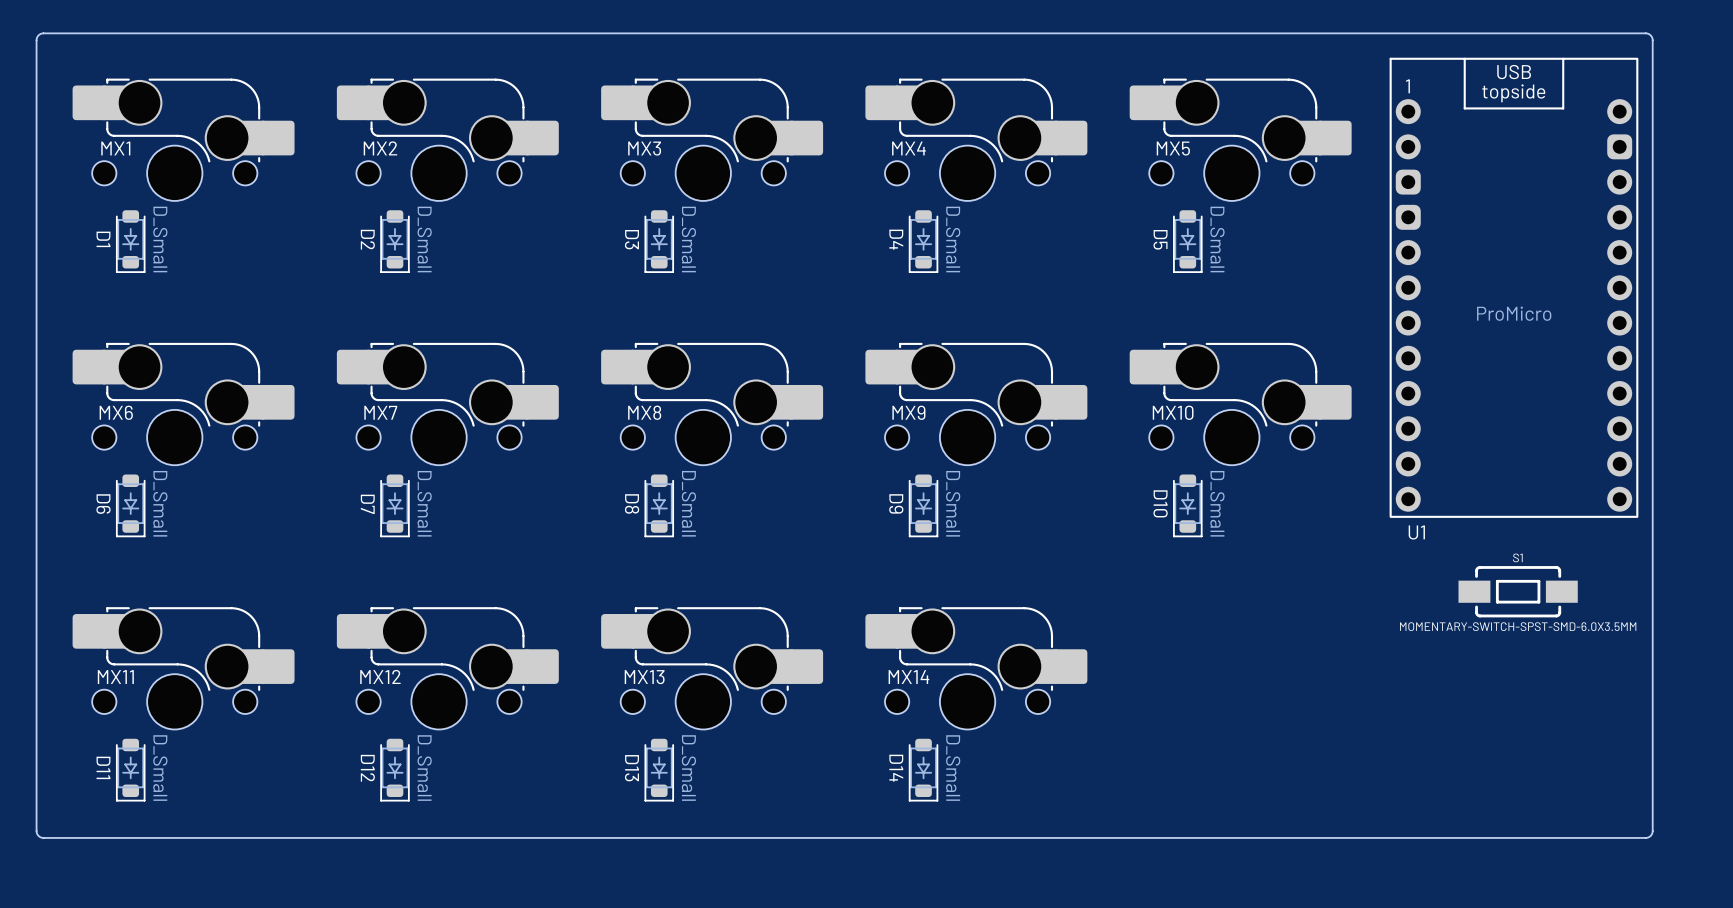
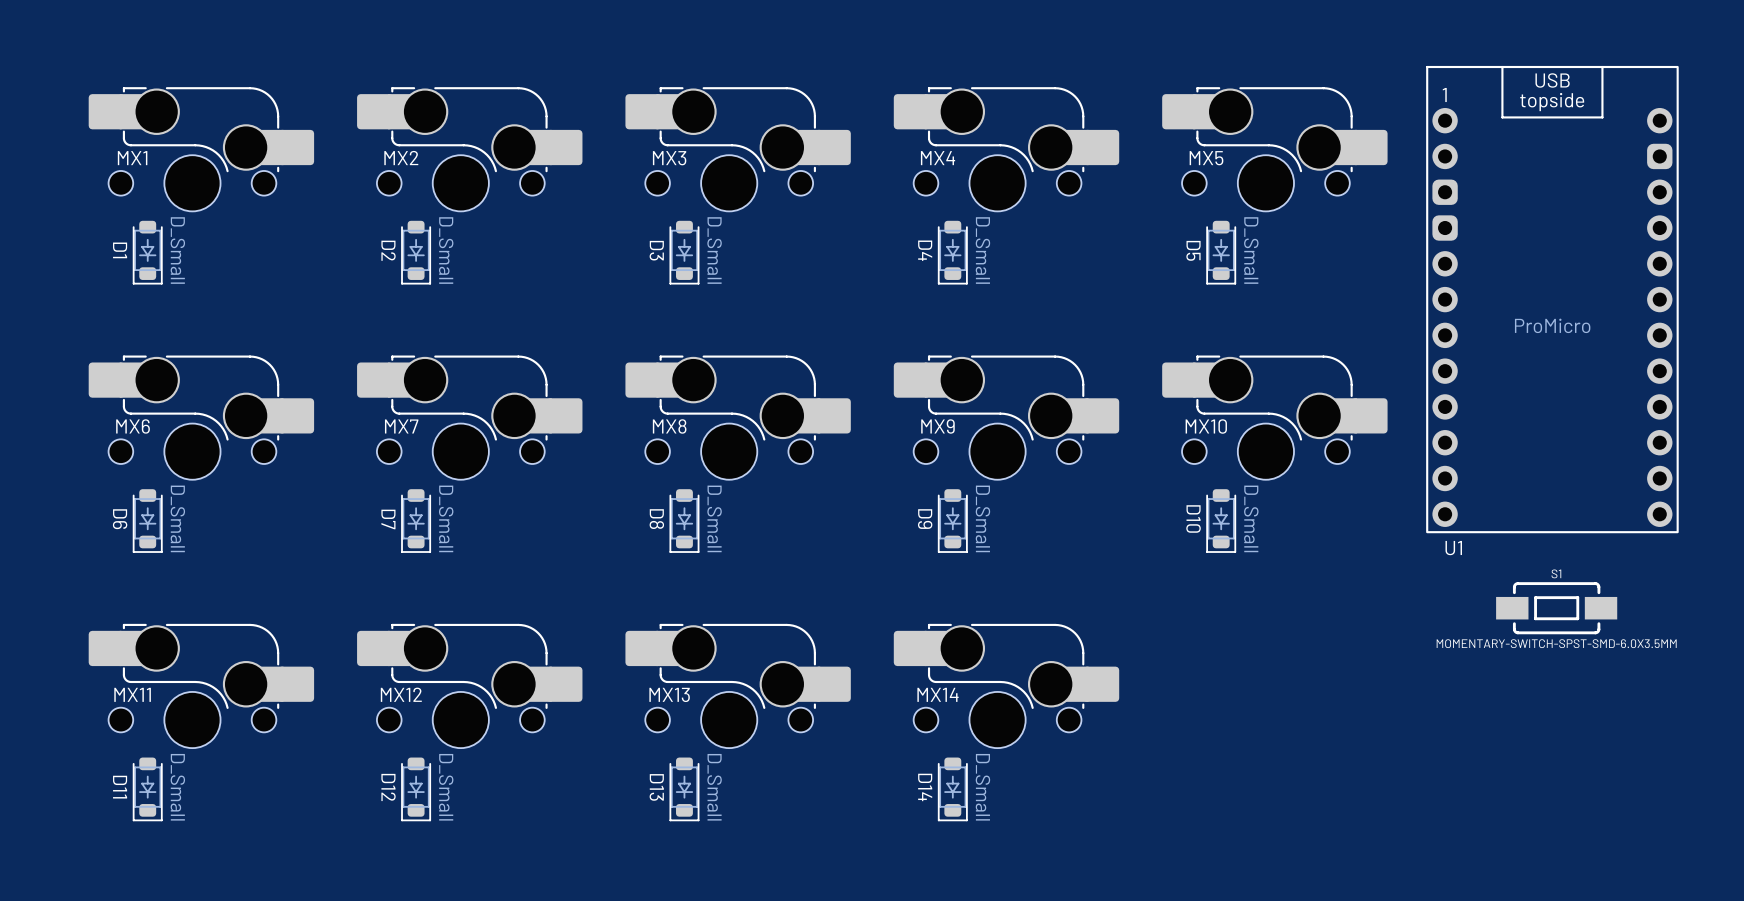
board edge: (1645, 33) (40, 34) (36, 40) (37, 834) (43, 837) (1649, 837) (1652, 831) (1652, 40) (1650, 35) (1645, 33) -> none

